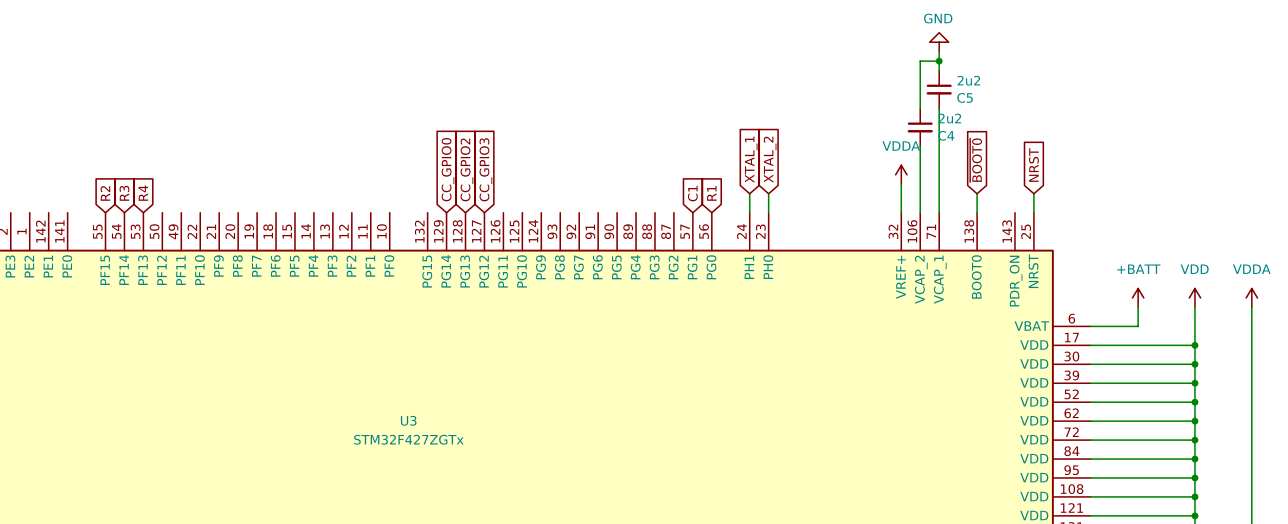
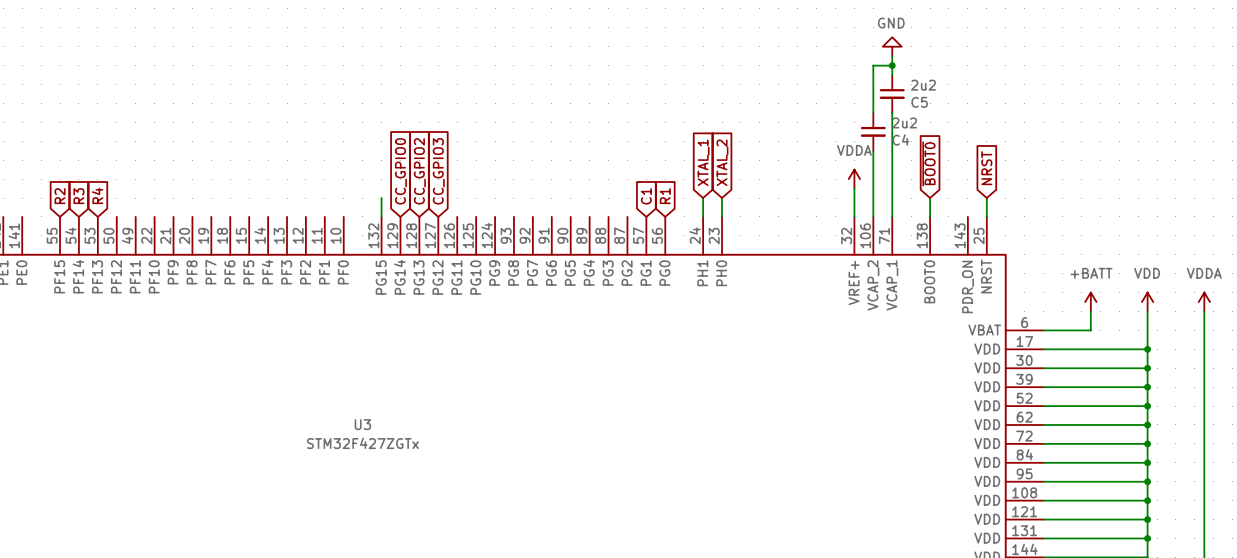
wire: none -> (381, 198) (381, 216)

